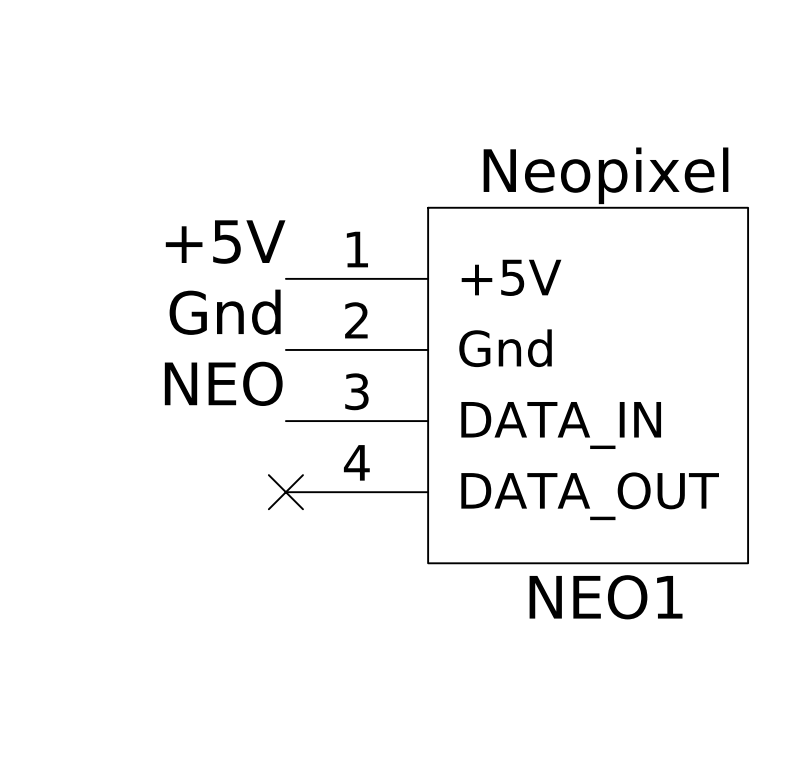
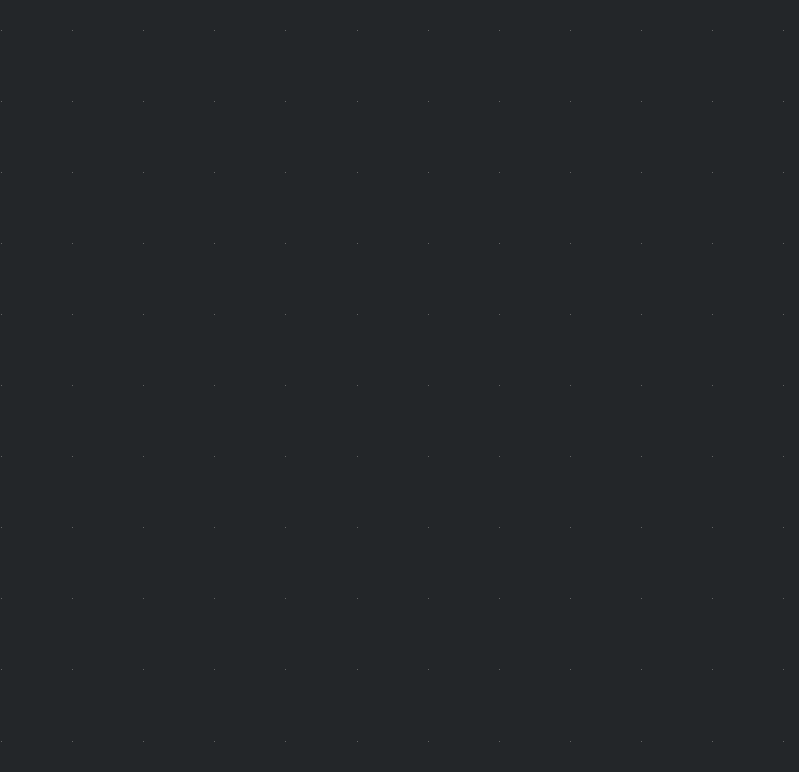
label: +5V (225, 242) -> none
label: Gnd (225, 312) -> none
label: NEO (223, 383) -> none
NEO1: Neopixel (517, 385) -> none
no-connect mark: (285, 492) -> none

